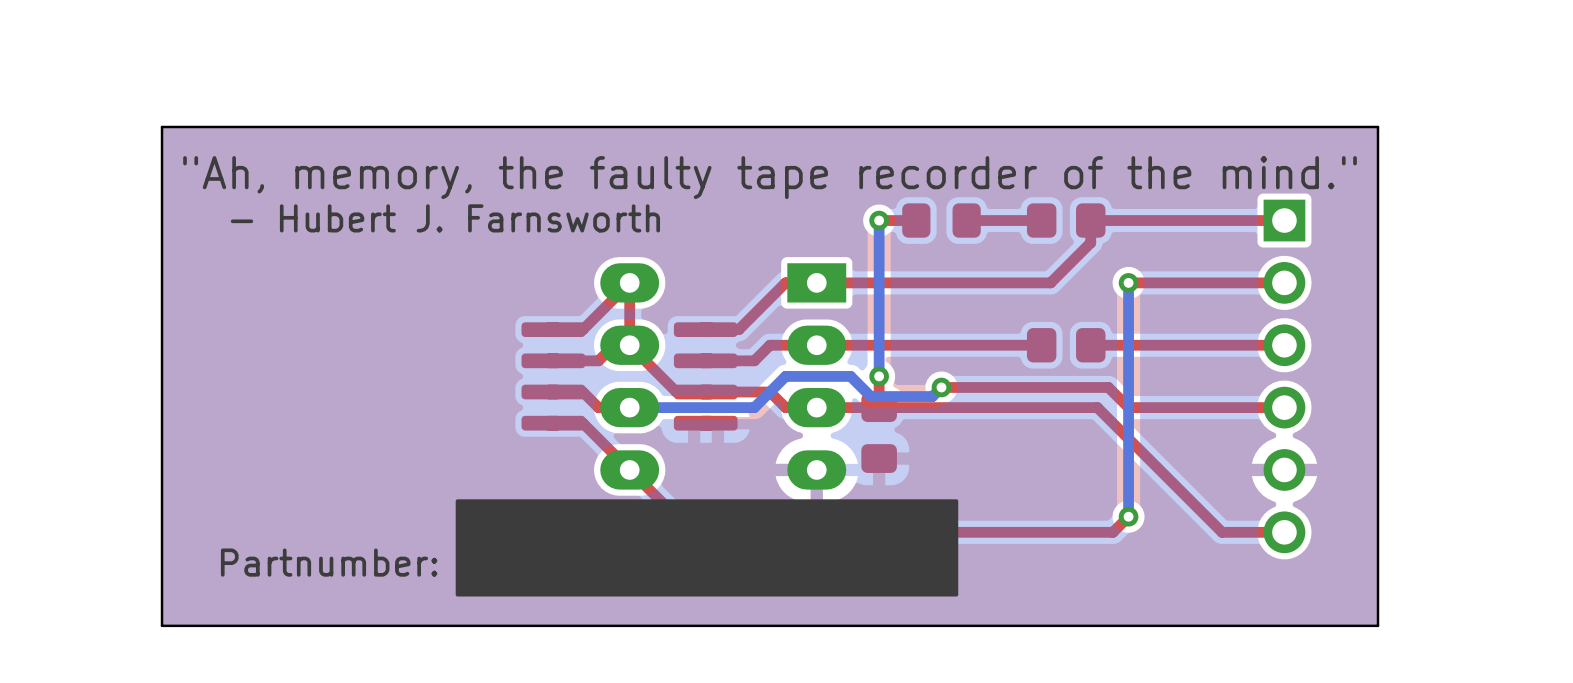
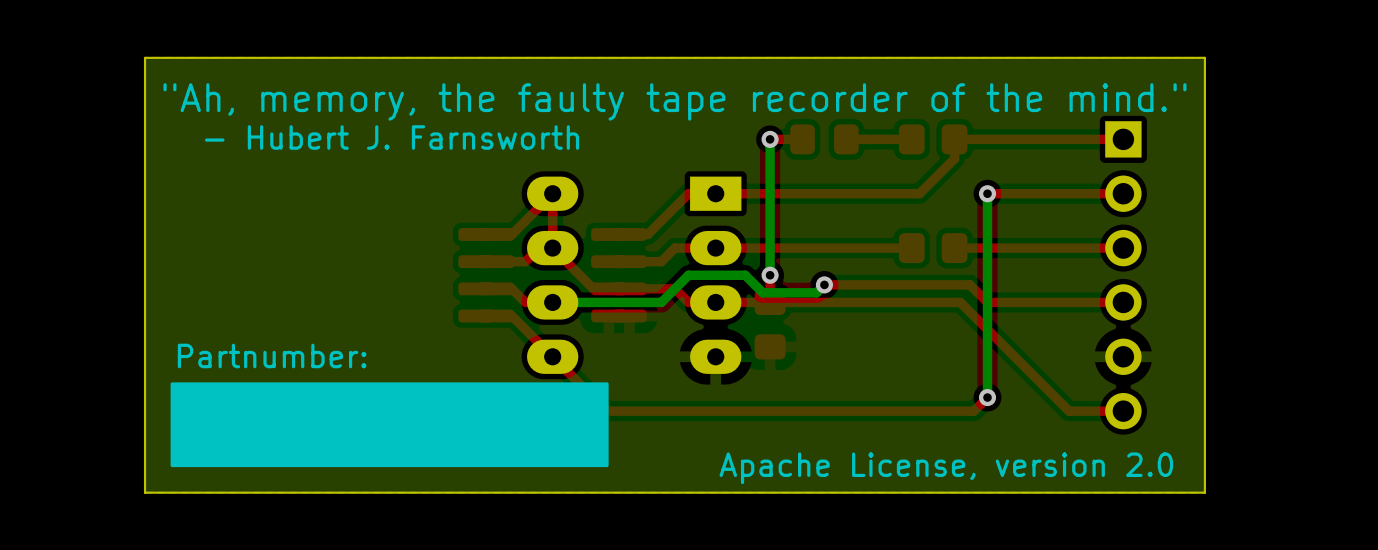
drawing position: (706, 547) -> (389, 424)
text position: Partnumber: (329, 562) -> Partnumber: (272, 355)
text: none -> Apache License, version 2.0 (946, 468)

